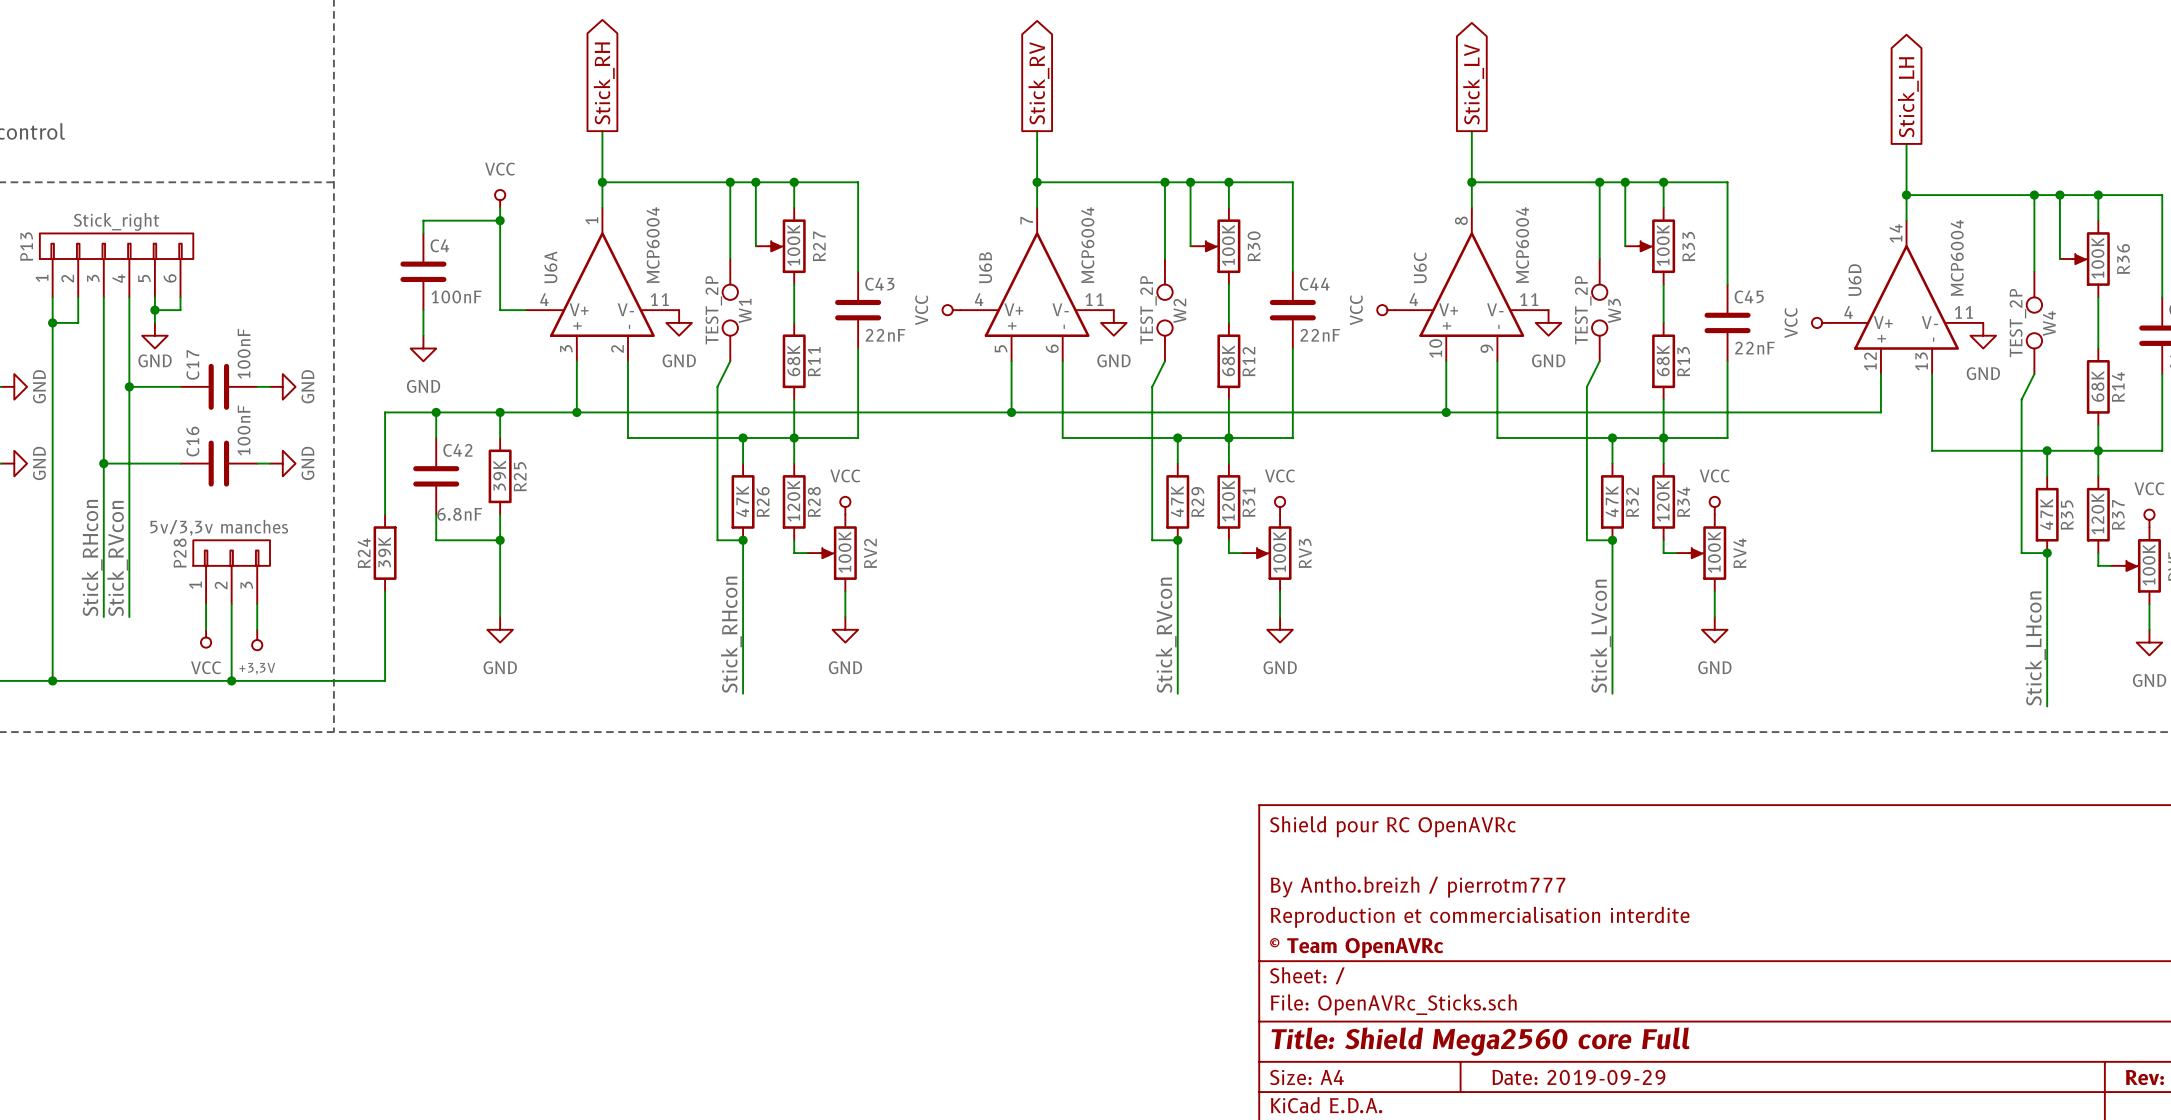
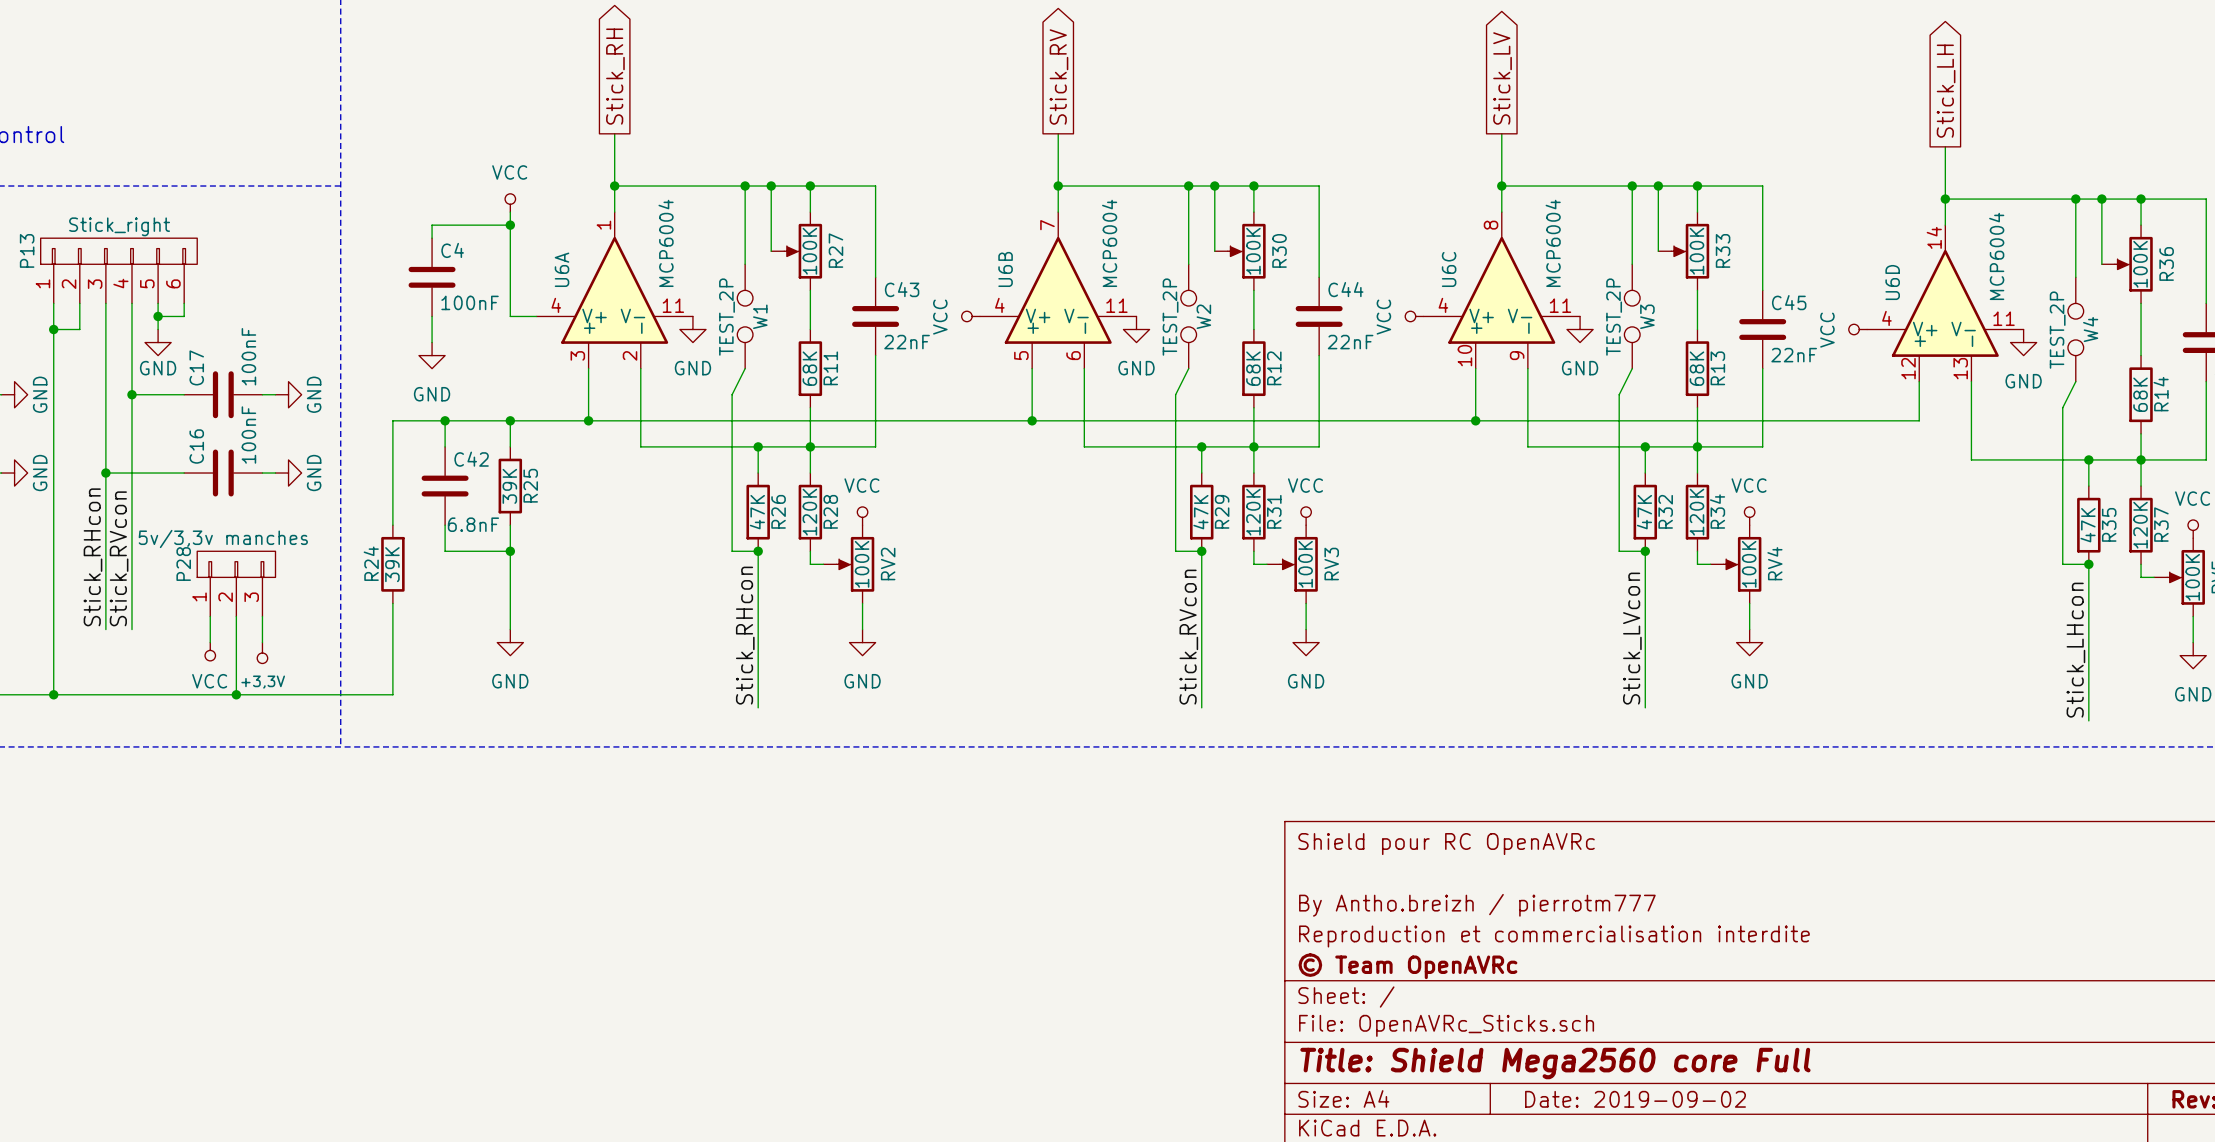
title block: Date: 2019-09-29 (1578, 1077) -> Date: 2019-09-02 (1635, 1099)

